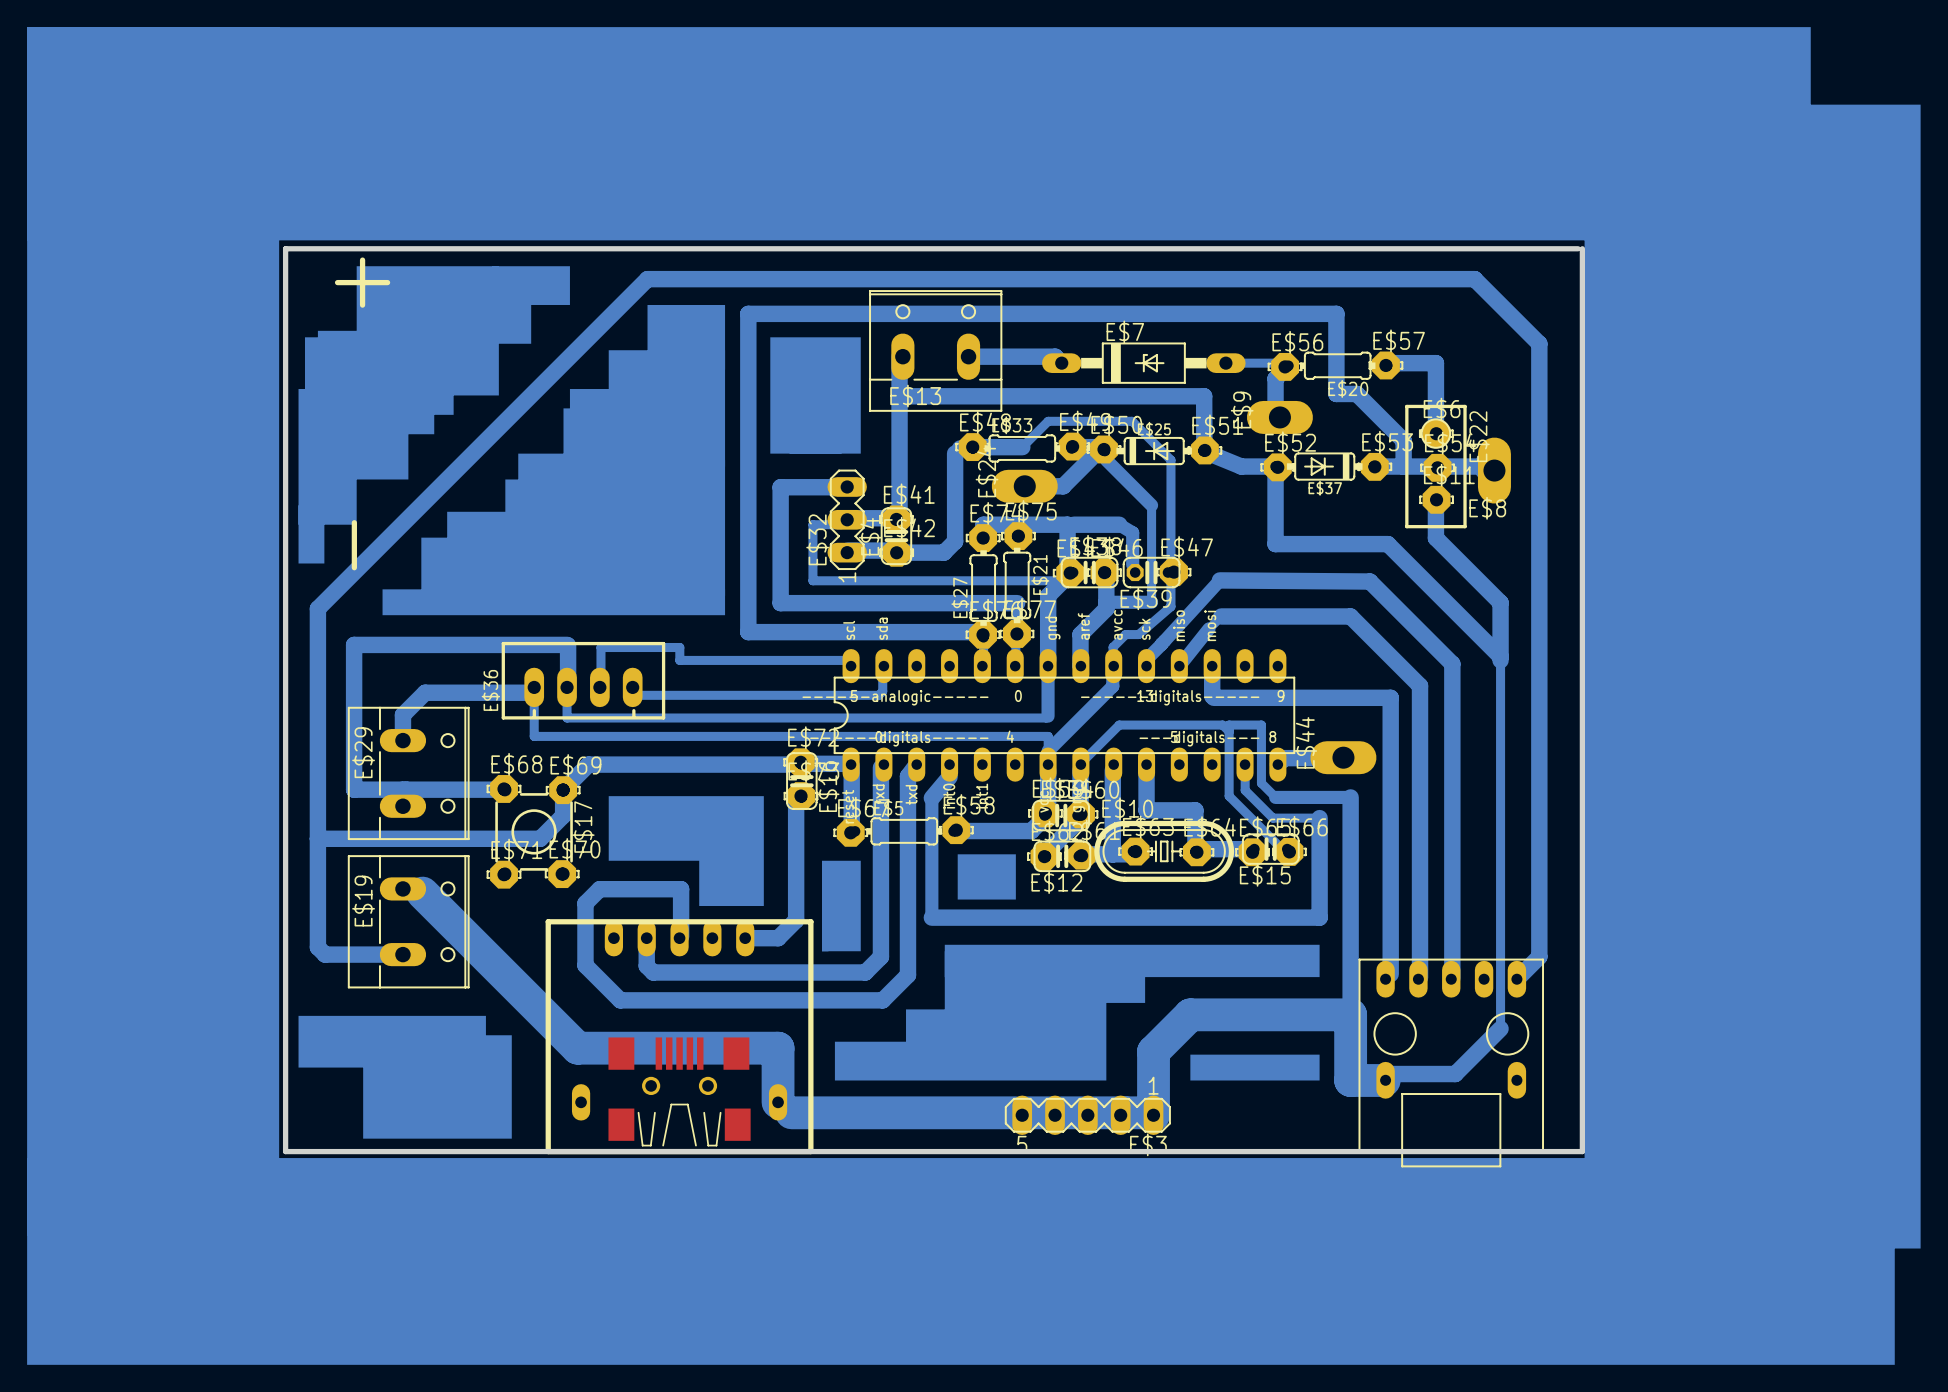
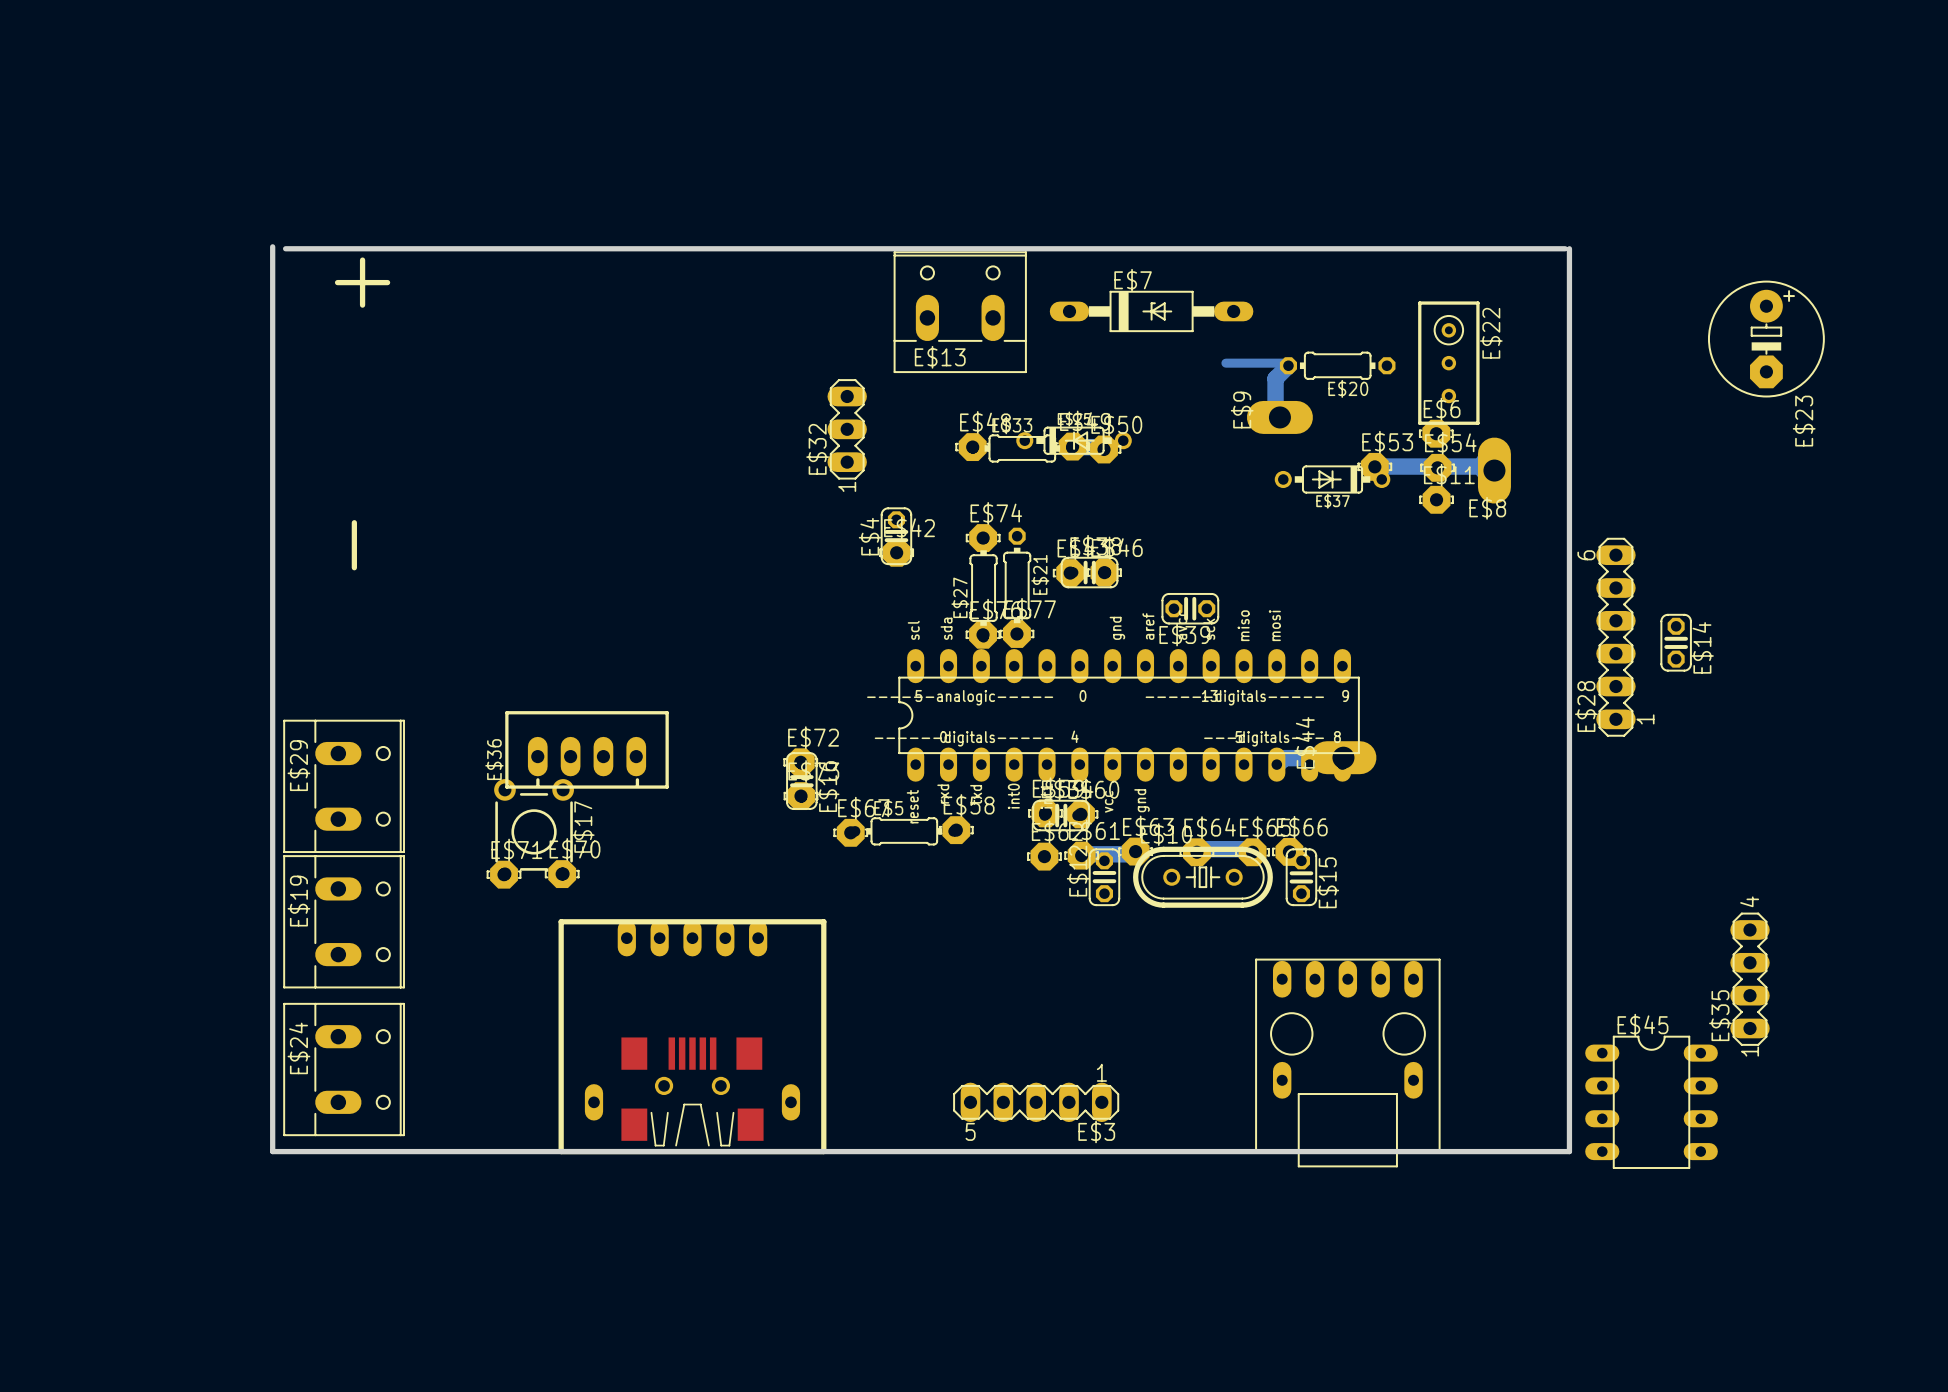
drawing: [27, 27, 1921, 1365] -> none
board edge: (285, 248) (285, 1151) -> (272, 246) (272, 1151) (285, 1151)
board edge: (1565, 248) (1578, 248) -> none
board edge: (1582, 248) (1582, 1151) (1569, 1151) -> (1569, 248) (1569, 1151)
drawing: [298, 266, 570, 564] -> none
drawing: [382, 304, 726, 616] -> none
drawing: [770, 337, 861, 454] -> none
E$23: none -> (1766, 339)
E$13 position: (935, 350) -> (960, 312)
bottom track: (902, 356) (899, 356) (899, 518) (896, 519) (847, 518) (841, 524) (812, 524) (812, 580) (1063, 580) -> none
bottom track: (968, 356) (1055, 356) (1061, 363) -> none
E$7 position: (1143, 363) -> (1151, 311)
E$57: (1385, 365) -> none
bottom track: (1386, 365) (1390, 363) (1435, 363) (1435, 433) -> none
E$56: (1285, 366) -> none
bottom track: (899, 396) (1204, 396) (1203, 451) (1241, 466) (1275, 466) (1275, 544) (1387, 544) (1500, 656) -> none
E$51: (1204, 450) -> none
E$25 position: (1154, 451) -> (1074, 440)
E$37 position: (1324, 466) -> (1332, 479)
bottom track: (1403, 466) (1403, 440) (1356, 393) (1336, 393) (1336, 313) (748, 313) (748, 632) (978, 632) (983, 637) (982, 666) -> none
E$22 position: (1435, 466) -> (1448, 363)
E$52: (1277, 467) -> none
E$24 footprint: [991, 469, 1058, 503] -> [283, 1002, 405, 1137]
bottom track: (847, 486) (780, 487) (780, 603) (1017, 603) (1015, 666) -> none
bottom track: (1024, 486) (1063, 486) (1098, 451) (1104, 451) (1106, 460) (1151, 505) (1151, 602) (1106, 602) -> none
bottom track: (1435, 499) (1435, 538) (1500, 602) (1500, 660) -> none
E$32 position: (847, 519) -> (847, 429)
E$41: (896, 519) -> none
bottom track: (1074, 524) (1119, 524) (1132, 532) (1132, 564) (1135, 572) -> none
E$75: (1018, 536) -> none
bottom track: (983, 538) (983, 524) (1006, 524) (1017, 536) (1015, 524) (1067, 524) (1067, 566) (1073, 572) (1048, 595) (1048, 716) (1046, 718) (567, 718) (567, 644) (354, 644) (354, 789) (402, 789) (402, 806) -> none
bottom track: (847, 552) (847, 550) (944, 552) (955, 541) (955, 453) (960, 448) (1022, 447) (1048, 421) (1132, 421) (1170, 460) (1170, 572) (1167, 572) (1170, 575) (1170, 606) (1138, 634) (1125, 634) (1113, 647) (1112, 686) (1048, 750) -> none
bottom track: (1105, 572) (1106, 608) (1080, 634) (1080, 666) -> none
E$39 position: (1151, 572) -> (1190, 608)
E$47: (1174, 572) -> none
E$28: none -> (1615, 637)
E$14: none -> (1676, 642)
bottom track: (1500, 653) (1500, 1028) (1455, 1074) (1390, 1074) (1385, 1080) (1350, 1080) (1350, 1014) -> none
bottom track: (851, 666) (851, 660) (679, 660) (679, 647) (600, 647) (599, 687) -> none
bottom track: (883, 666) (882, 691) (878, 695) (632, 695) (632, 687) -> none
bottom track: (1146, 666) (1146, 659) (1219, 580) (1369, 581) (1452, 663) (1451, 979) -> none
bottom track: (1179, 666) (1221, 616) (1350, 616) (1420, 685) (1420, 977) (1418, 979) -> none
bottom track: (1212, 666) (1212, 696) (1213, 697) (1390, 697) (1390, 974) (1385, 979) -> none
E$36 position: (583, 680) -> (587, 749)
part position: (1064, 715) -> (1129, 715)
bottom track: (1229, 731) (1222, 725) (1119, 725) (1080, 763) (1080, 815) (1077, 815) (1077, 821) (1048, 850) (1045, 856) -> none
bottom track: (402, 740) (402, 714) (425, 692) (531, 692) (534, 687) (534, 736) (1048, 736) (1048, 764) -> none
bottom track: (883, 764) (880, 767) (880, 956) (865, 972) (653, 972) (646, 965) (646, 938) -> none
bottom track: (916, 764) (907, 776) (907, 975) (882, 1000) (620, 1000) (585, 965) (585, 903) (599, 889) (681, 889) (681, 936) (679, 938) -> none
bottom track: (949, 764) (949, 777) (931, 798) (931, 917) (1319, 917) (1319, 818) (1272, 818) (1245, 790) (1245, 764) -> none
bottom track: (1048, 764) (1048, 815) (1044, 815) (1031, 831) (953, 831) -> none
bottom track: (1113, 764) (1112, 854) -> none
bottom track: (1146, 764) (1146, 810) (1195, 810) (1195, 851) -> none
E$29 position: (408, 773) -> (344, 786)
E$68: (504, 788) -> none
bottom track: (504, 789) (406, 789) (402, 793) -> none
E$69: (563, 790) -> none
drawing: [608, 796, 764, 907] -> none
bottom track: (801, 797) (796, 802) (796, 920) (778, 938) (745, 938) -> none
bottom track: (855, 831) (851, 828) (851, 764) (588, 764) (563, 789) (563, 815) (540, 838) (317, 838) -> none
E$15 rotation: 0° (1270, 849) -> 90° counterclockwise (1301, 877)
E$15 position: (1270, 849) -> (1301, 877)
bottom track: (1287, 849) (1280, 847) (1229, 796) (1229, 725) (1261, 725) (1261, 783) (1275, 797) (1350, 797) (1350, 1014) -> none
E$10 position: (1164, 851) -> (1202, 877)
drawing: [957, 854, 1016, 900] -> none
E$12 rotation: 0° (1062, 856) -> 90° clockwise (1104, 877)
E$12 position: (1062, 856) -> (1104, 877)
drawing: [821, 860, 861, 952] -> none
bottom track: (402, 888) (408, 893) (422, 893) (577, 1048) (778, 1048) (778, 1102) (791, 1112) (1015, 1112) (1022, 1115) (1022, 1112) (1054, 1112) (1055, 1115) (1061, 1112) (1086, 1112) (1087, 1115) (1093, 1112) (1119, 1112) (1120, 1115) (1125, 1112) (1151, 1112) (1153, 1115) (1153, 1051) (1190, 1014) (1350, 1014) -> none
E$19 position: (408, 921) -> (344, 921)
drawing: [834, 944, 1320, 1081] -> none
bottom track: (402, 954) (325, 954) (317, 947) (317, 608) (647, 279) (1474, 279) (1539, 343) (1539, 956) (1516, 979) -> none
E$35: none -> (1750, 979)
drawing: [298, 1015, 512, 1139] -> none
part position: (679, 1036) -> (692, 1036)
drawing: [1190, 1054, 1320, 1081] -> none
part position: (1451, 1062) -> (1347, 1062)
E$45: none -> (1651, 1102)
E$3 position: (1087, 1115) -> (1036, 1102)

